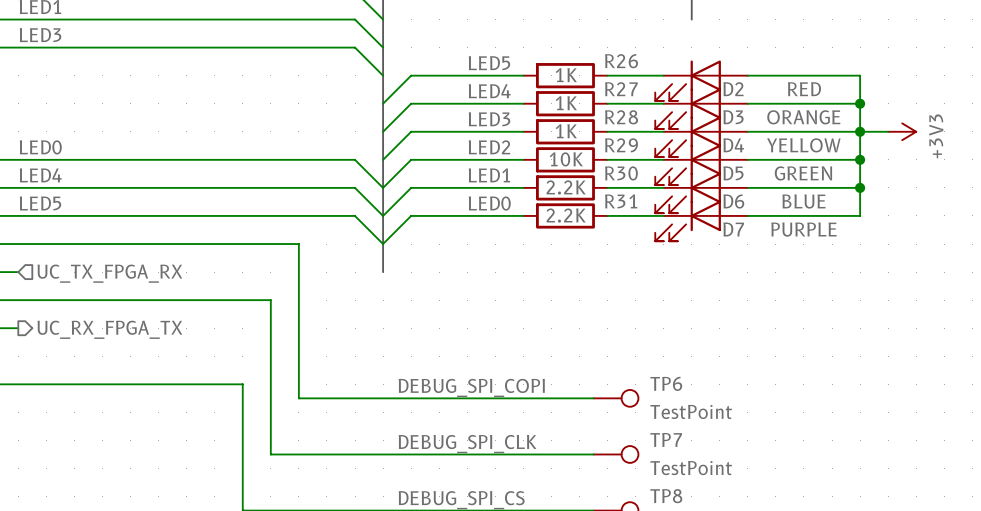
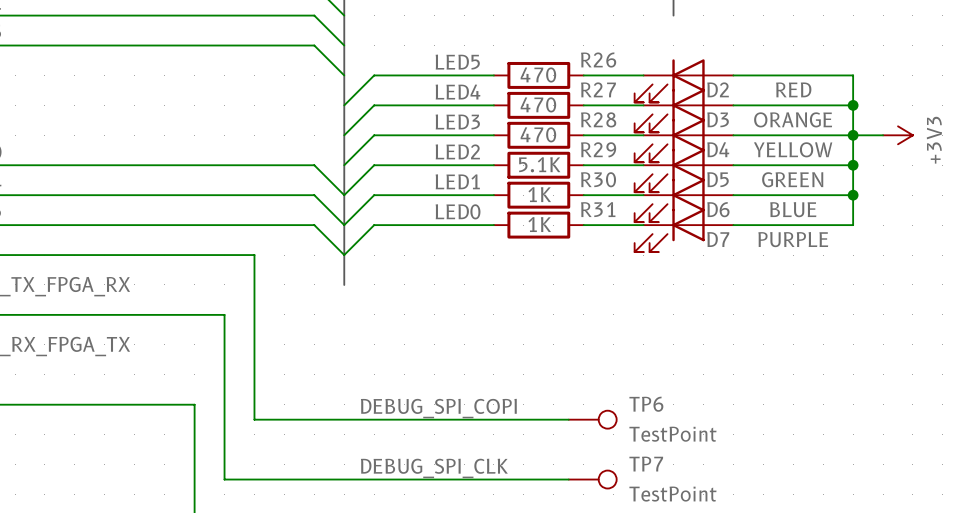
R26 value: 1K (566, 75) -> 470 (538, 74)
R27 value: 1K (566, 103) -> 470 (538, 104)
R28 value: 1K (566, 131) -> 470 (538, 134)
R29 value: 10K (566, 159) -> 5.1K (539, 164)
R30 value: 2.2K (566, 187) -> 1K (539, 194)
R31 value: 2.2K (566, 215) -> 1K (539, 224)

